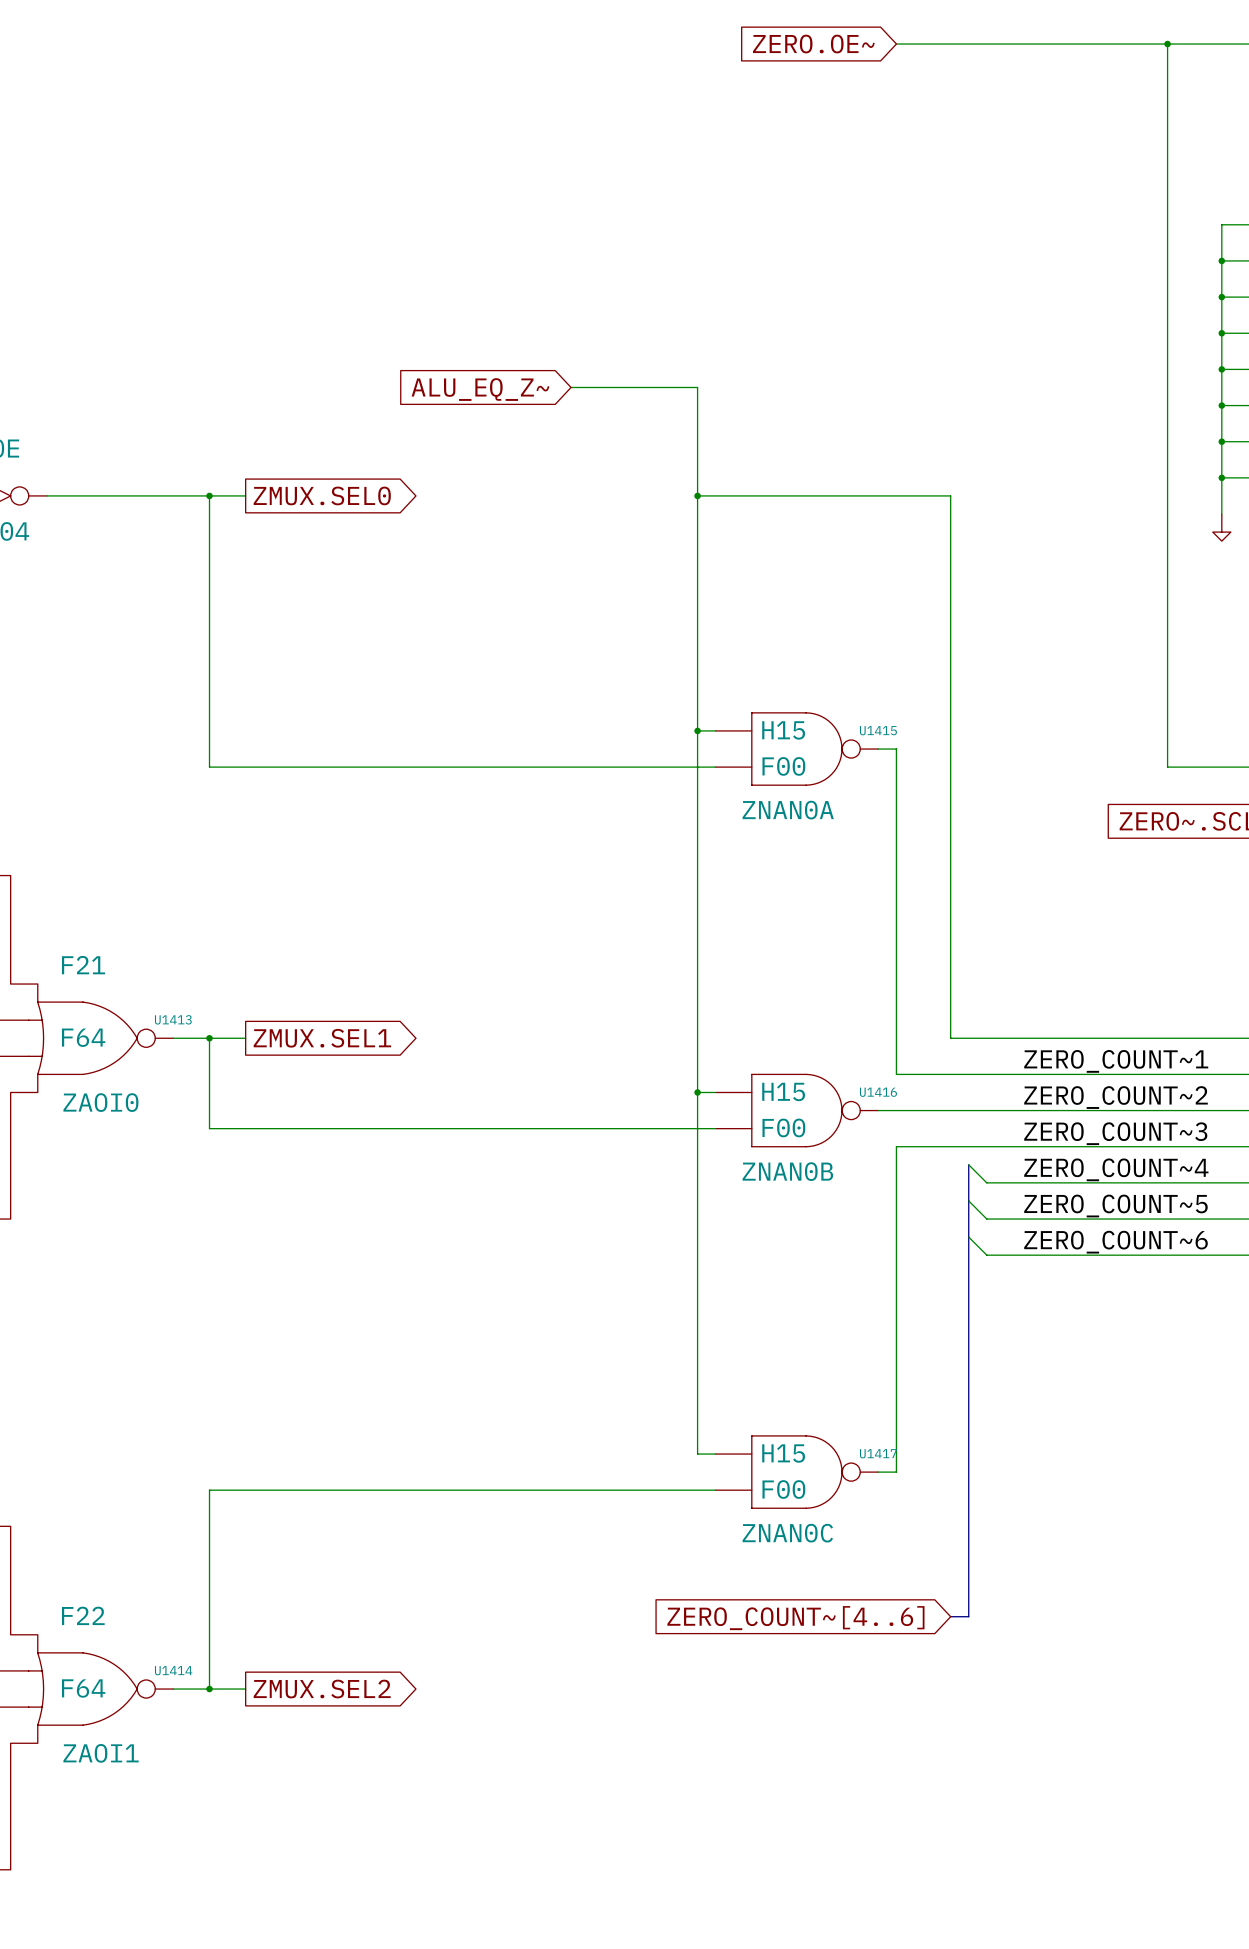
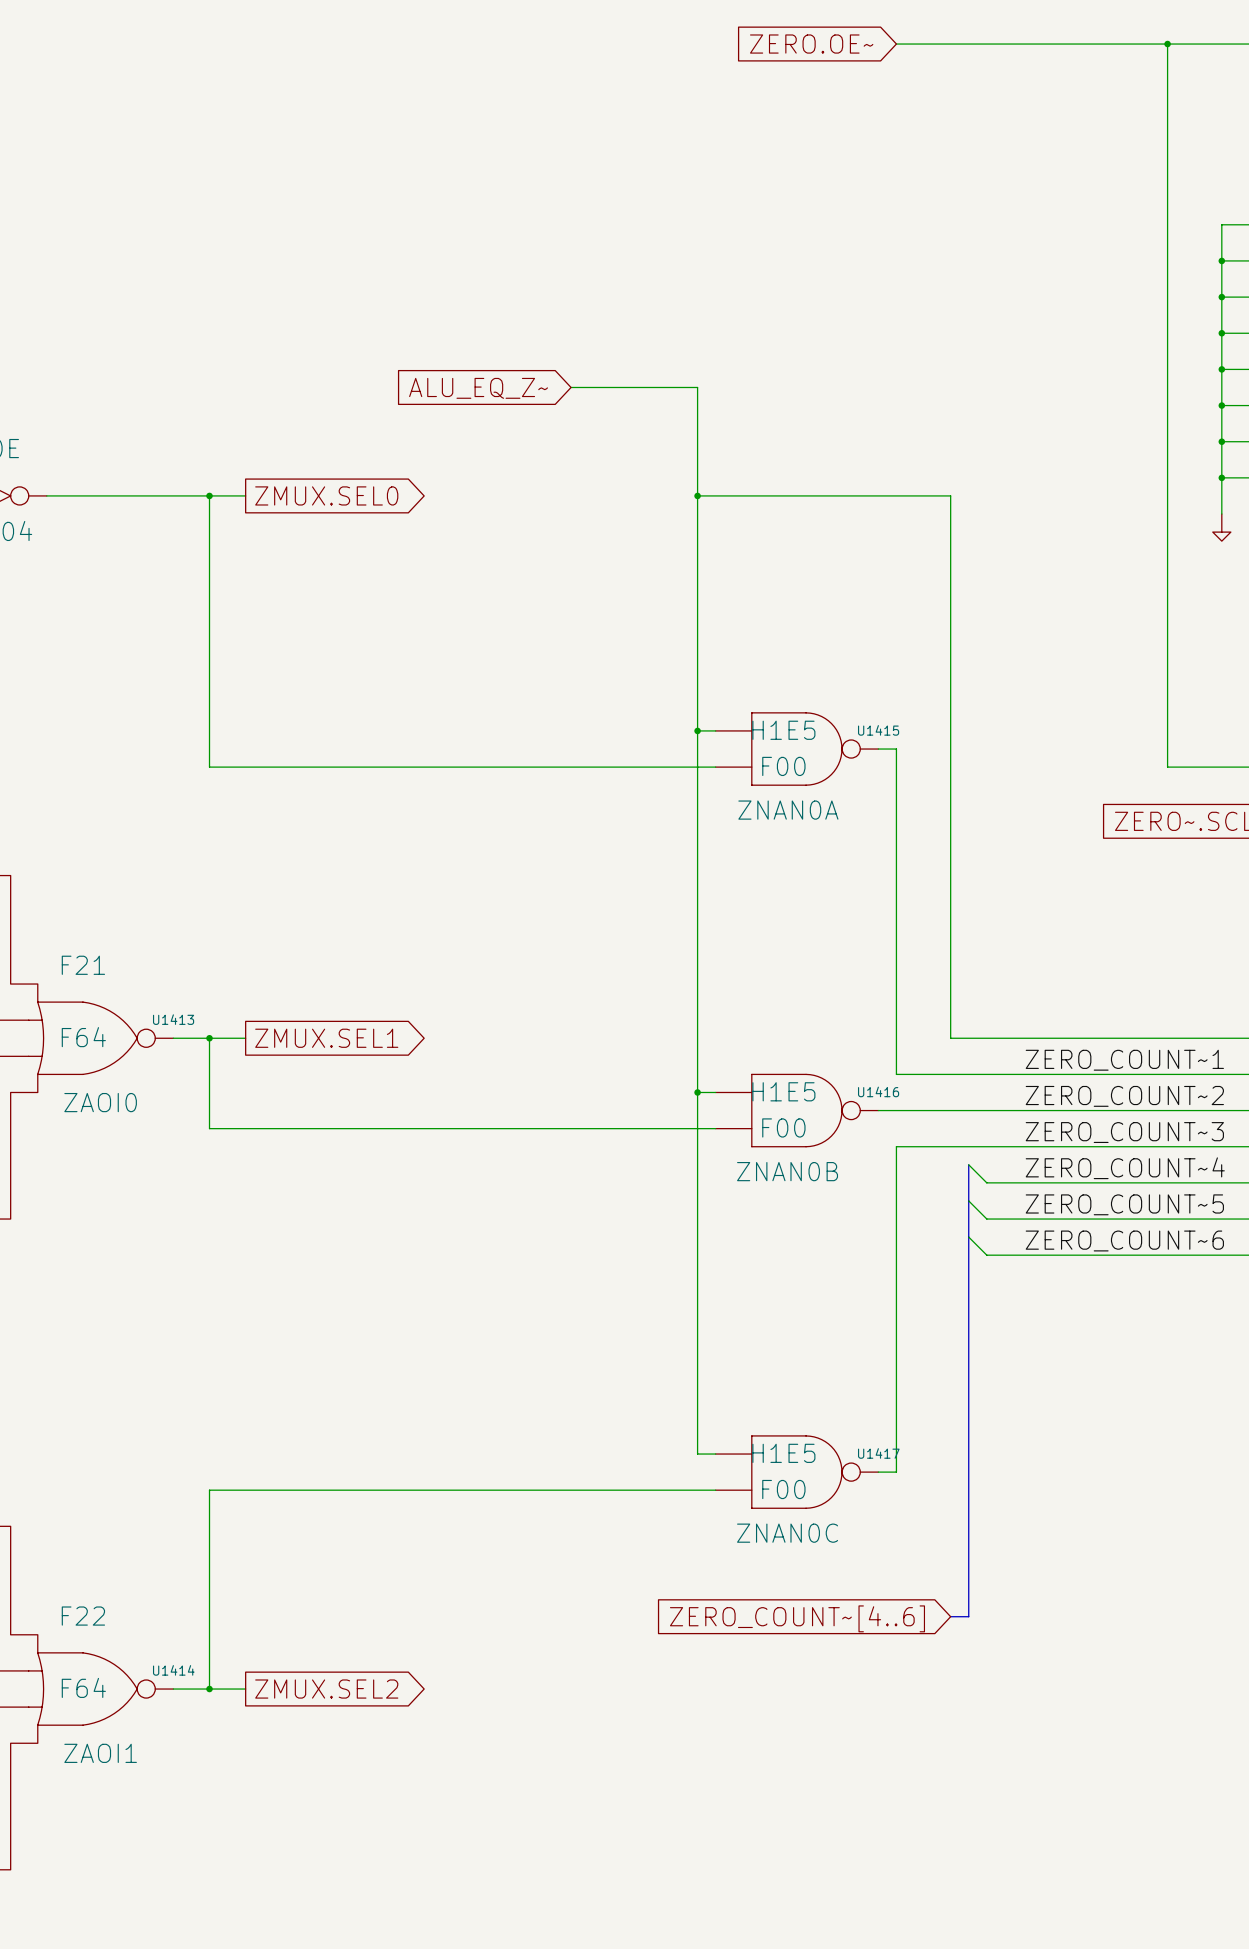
U1415 text: H15 (783, 730) -> H1E5 (783, 730)
U1416 text: H15 (783, 1091) -> H1E5 (783, 1091)
U1417 text: H15 (783, 1453) -> H1E5 (783, 1453)

